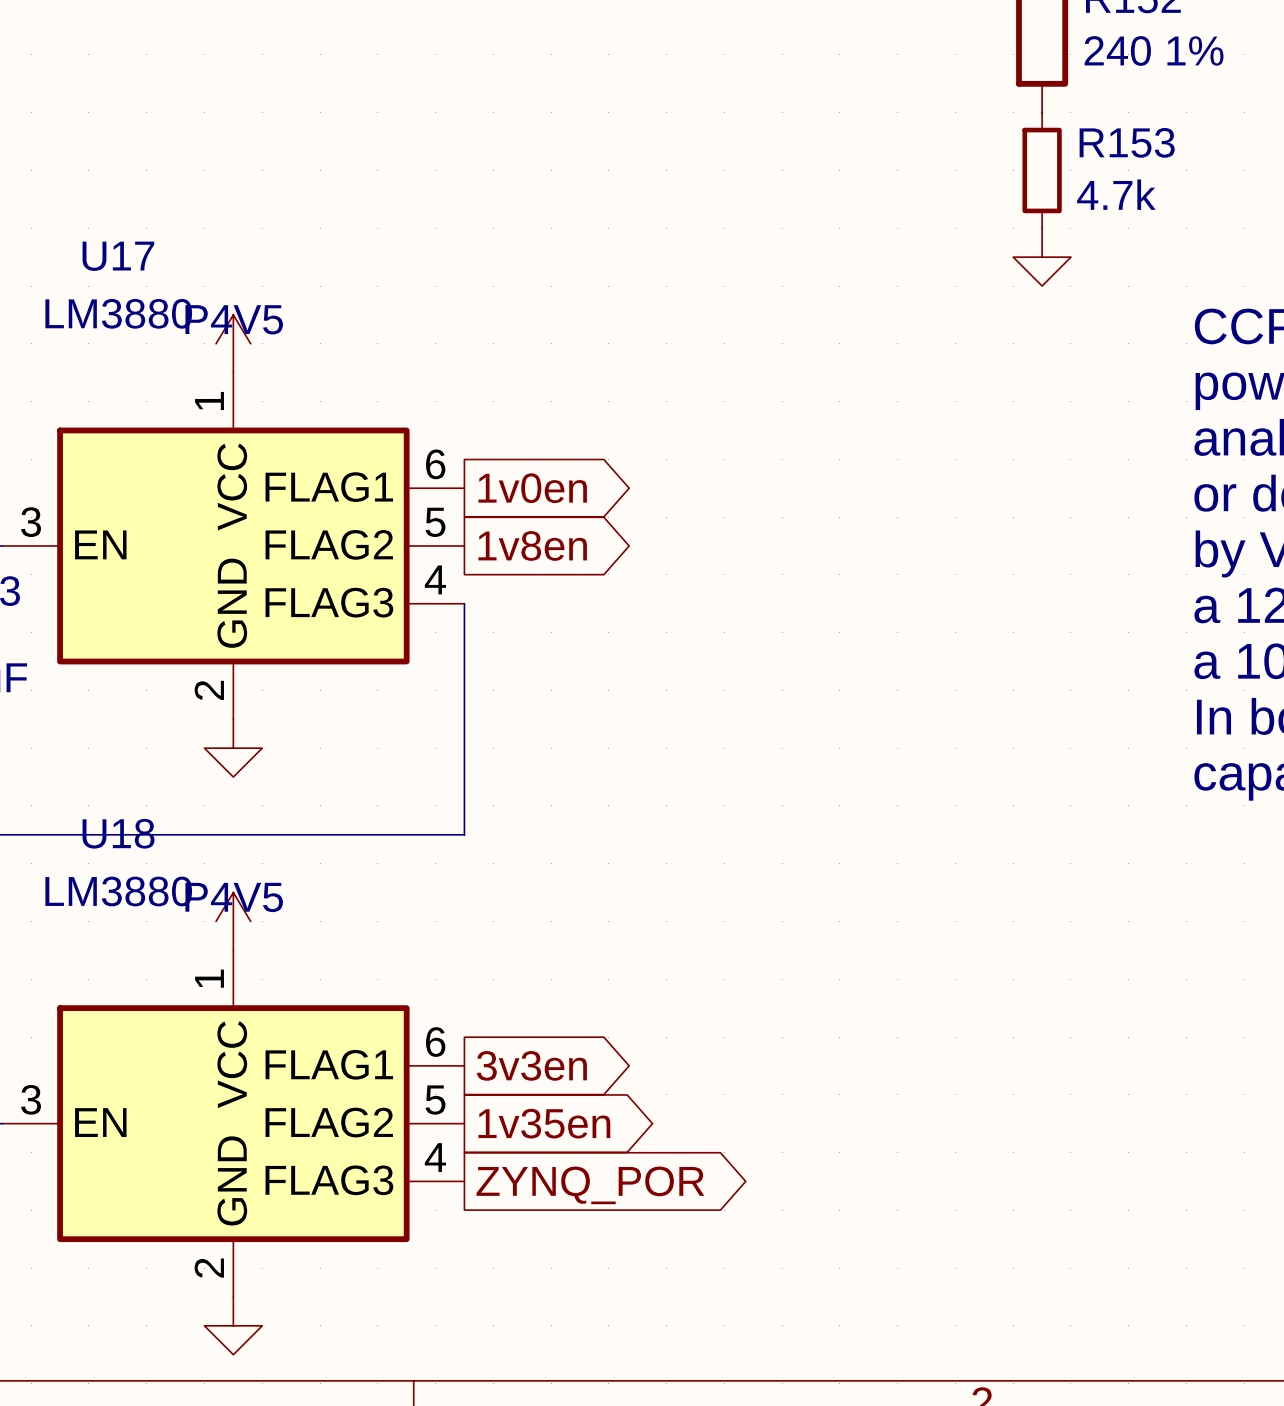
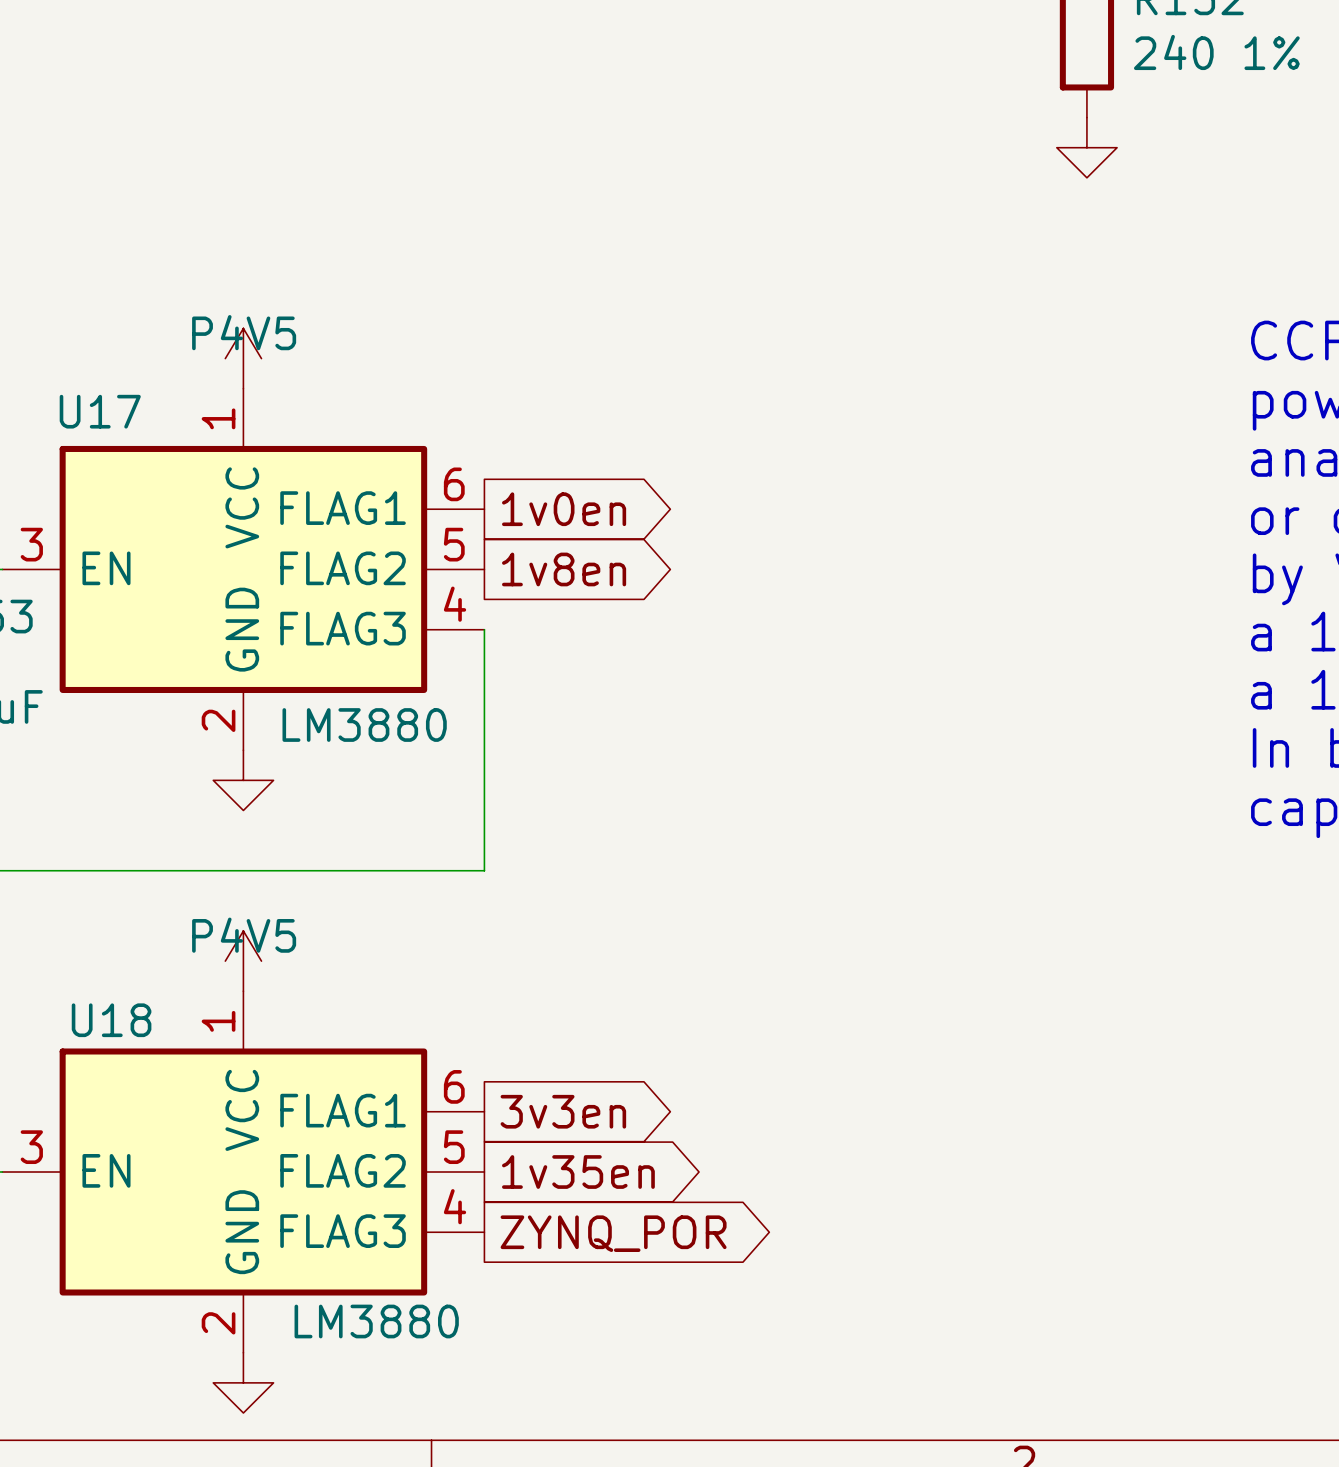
R153: 4.7k (1042, 170) -> none
U17 name position: U17 (118, 256) -> U17 (100, 411)
power symbol position: (1042, 257) -> (1086, 147)
U17 value position: LM3880 (118, 313) -> LM3880 (364, 725)
U18 name position: U18 (118, 833) -> U18 (111, 1020)
U18 value position: LM3880 (118, 891) -> LM3880 (376, 1321)

